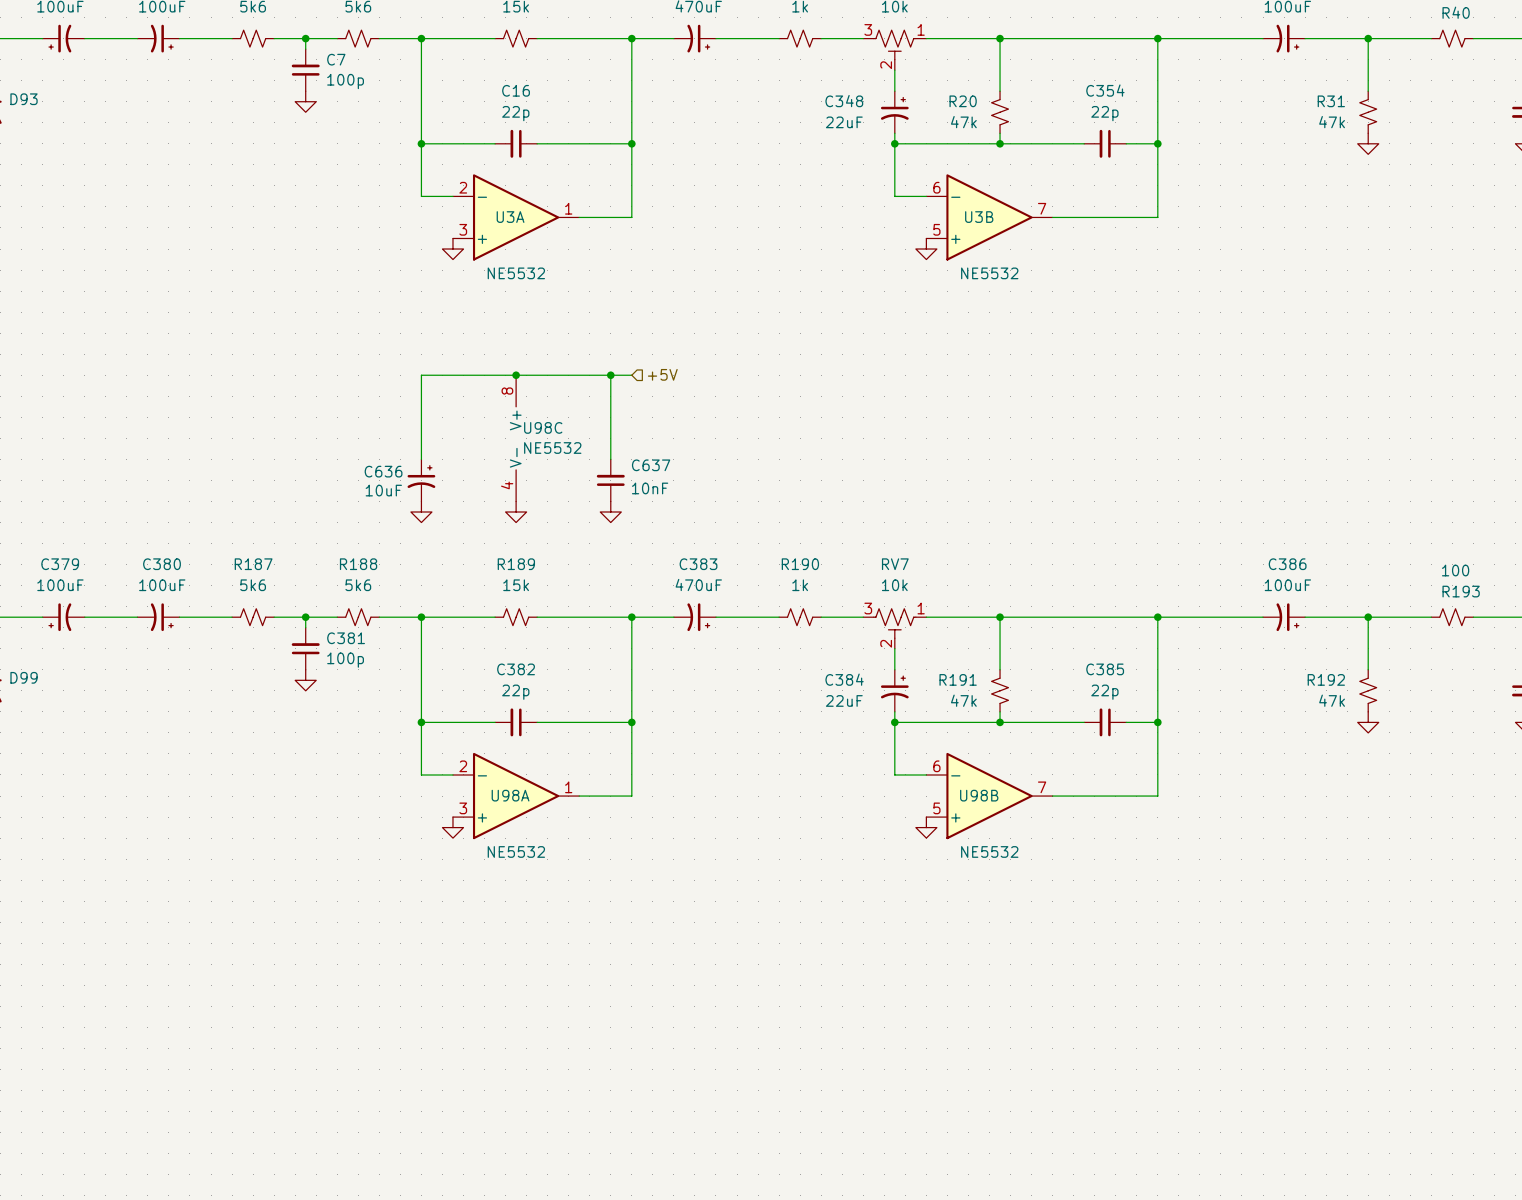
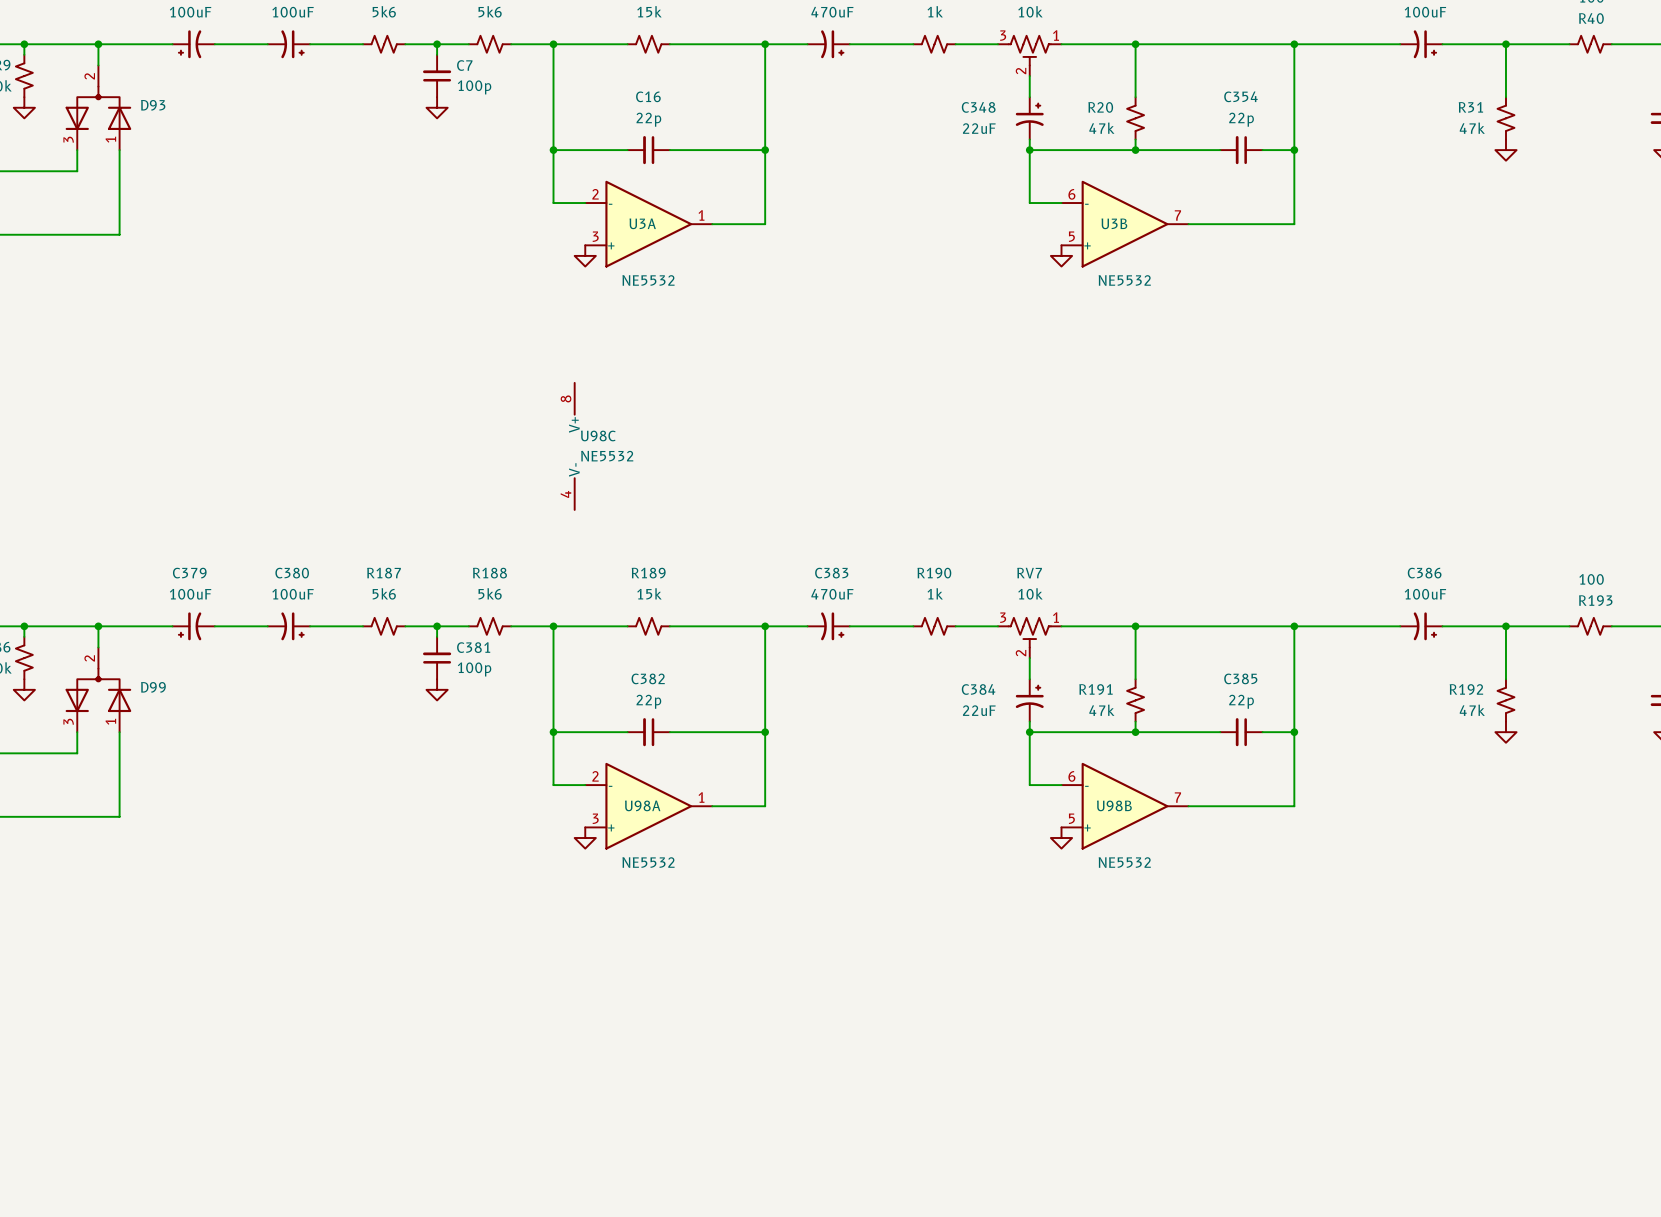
hierarchical label: +5V (662, 374) -> none
junction: (516, 375) -> none
wire: (610, 375) (610, 459) -> none
junction: (610, 375) -> none
wire: (631, 375) (421, 375) (421, 459) -> none
U98C position: (516, 438) -> (574, 446)
C636: 10uF (421, 480) -> none
C637: 10nF (610, 480) -> none
power symbol: (421, 512) -> none
power symbol: (516, 512) -> none
power symbol: (610, 512) -> none

